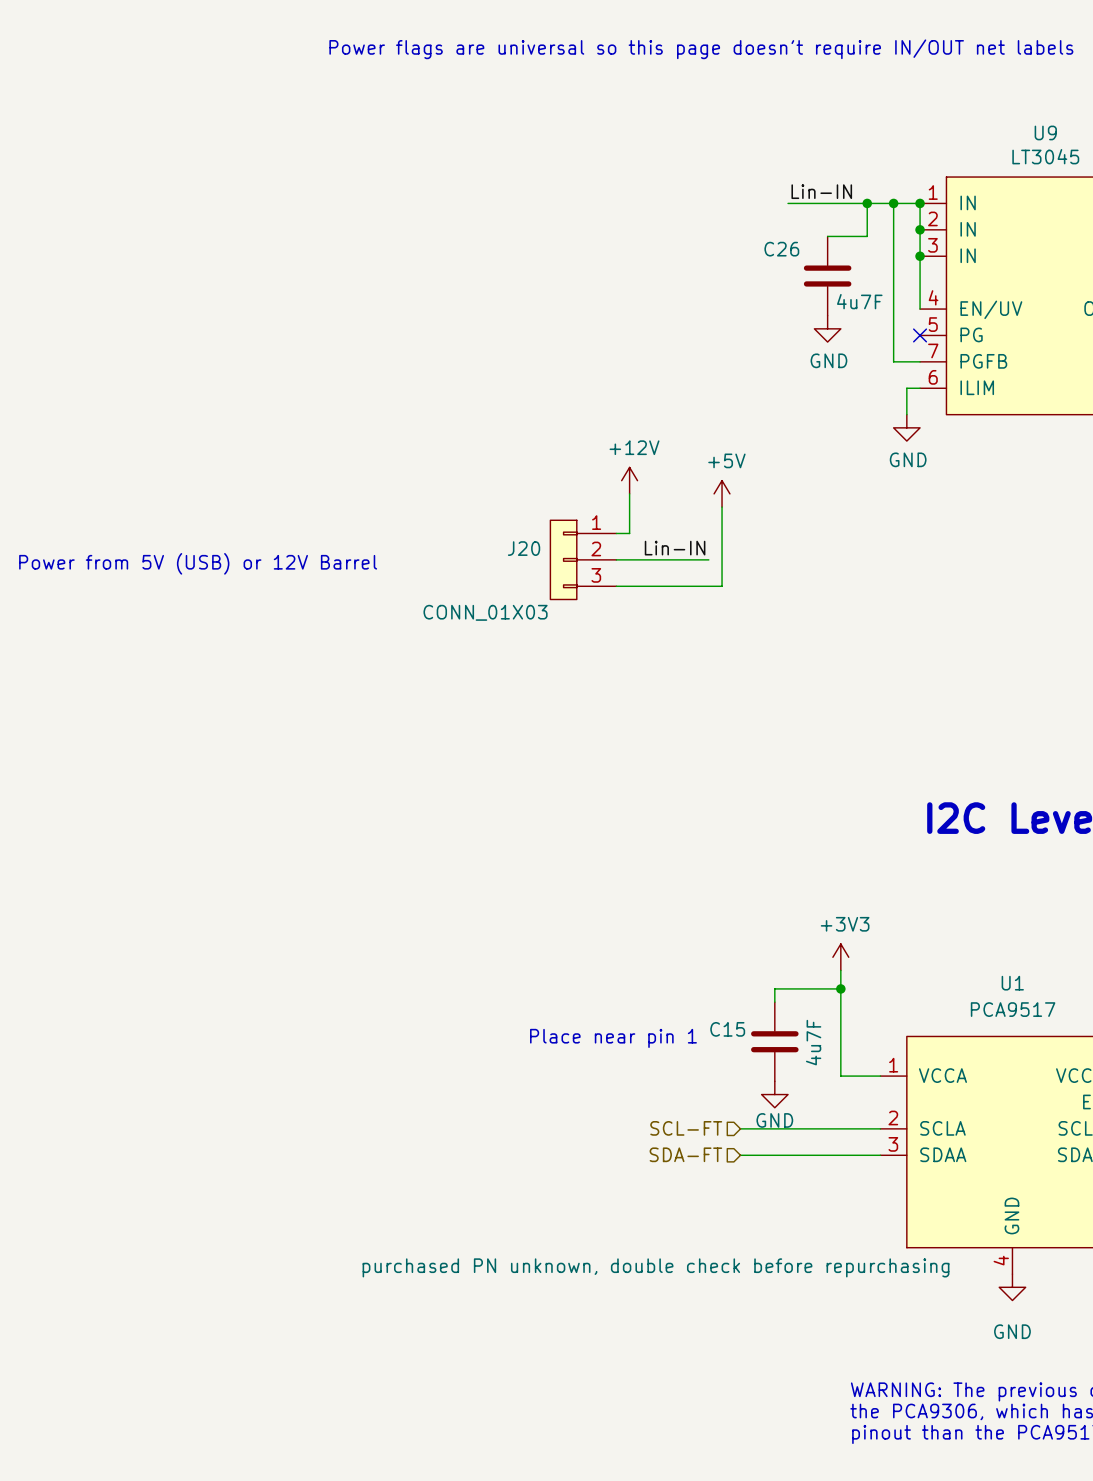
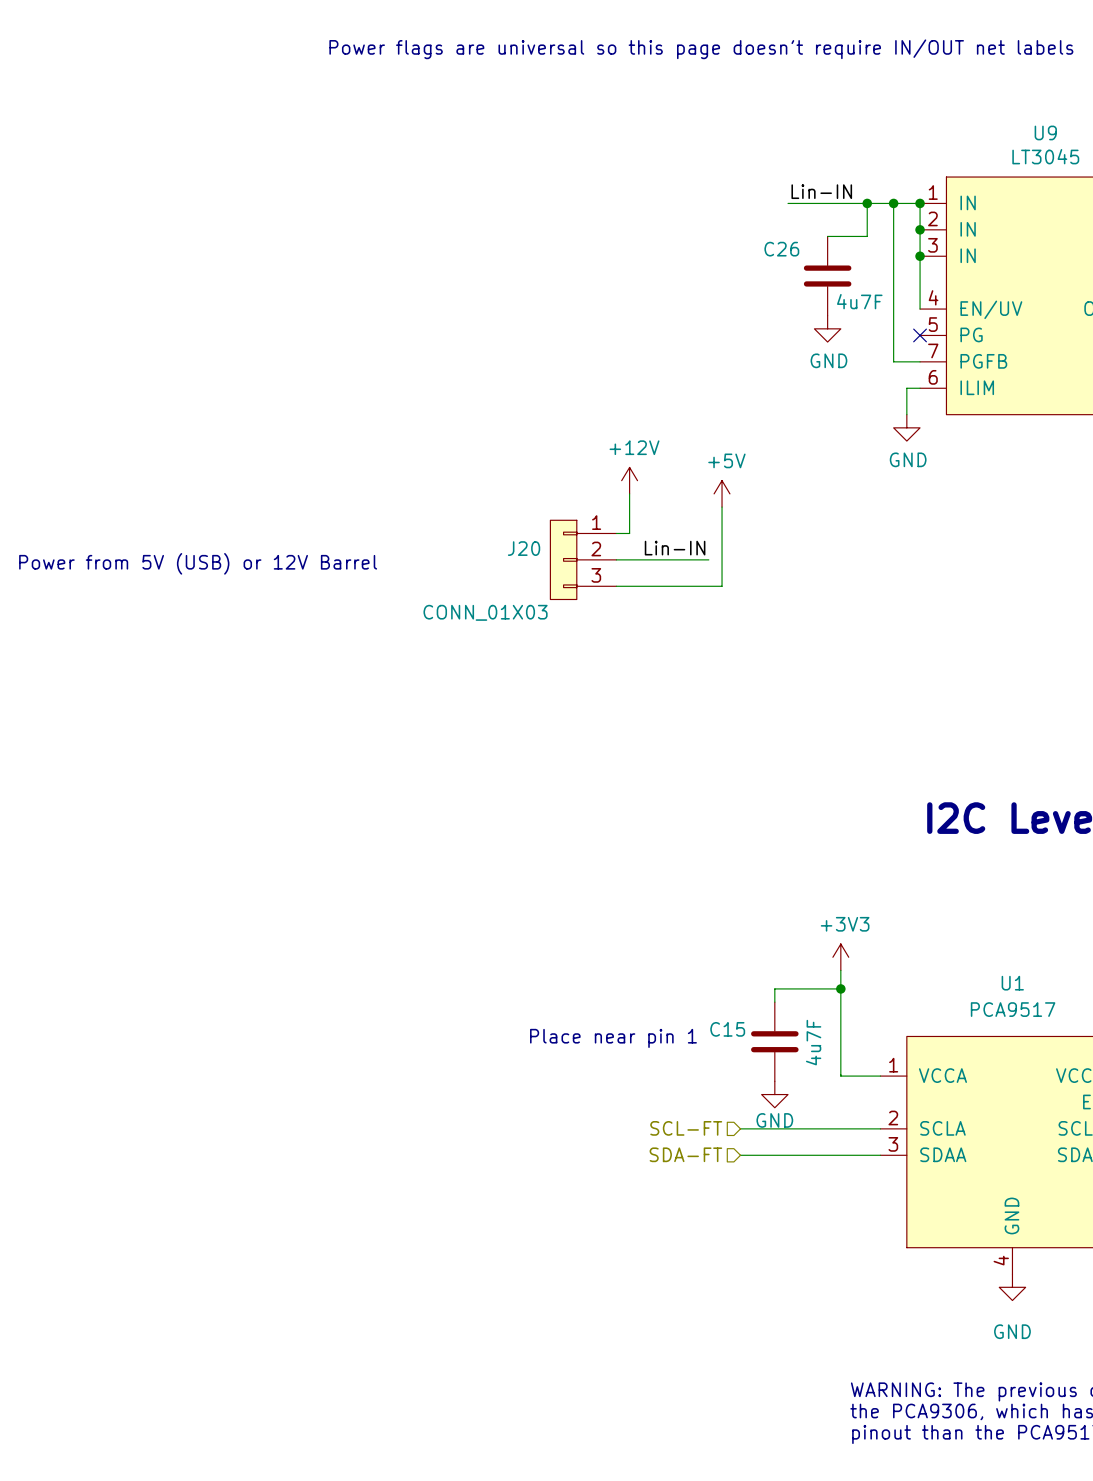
U1 text: purchased PN unknown, double check before repurchasing (656, 1267) -> none

